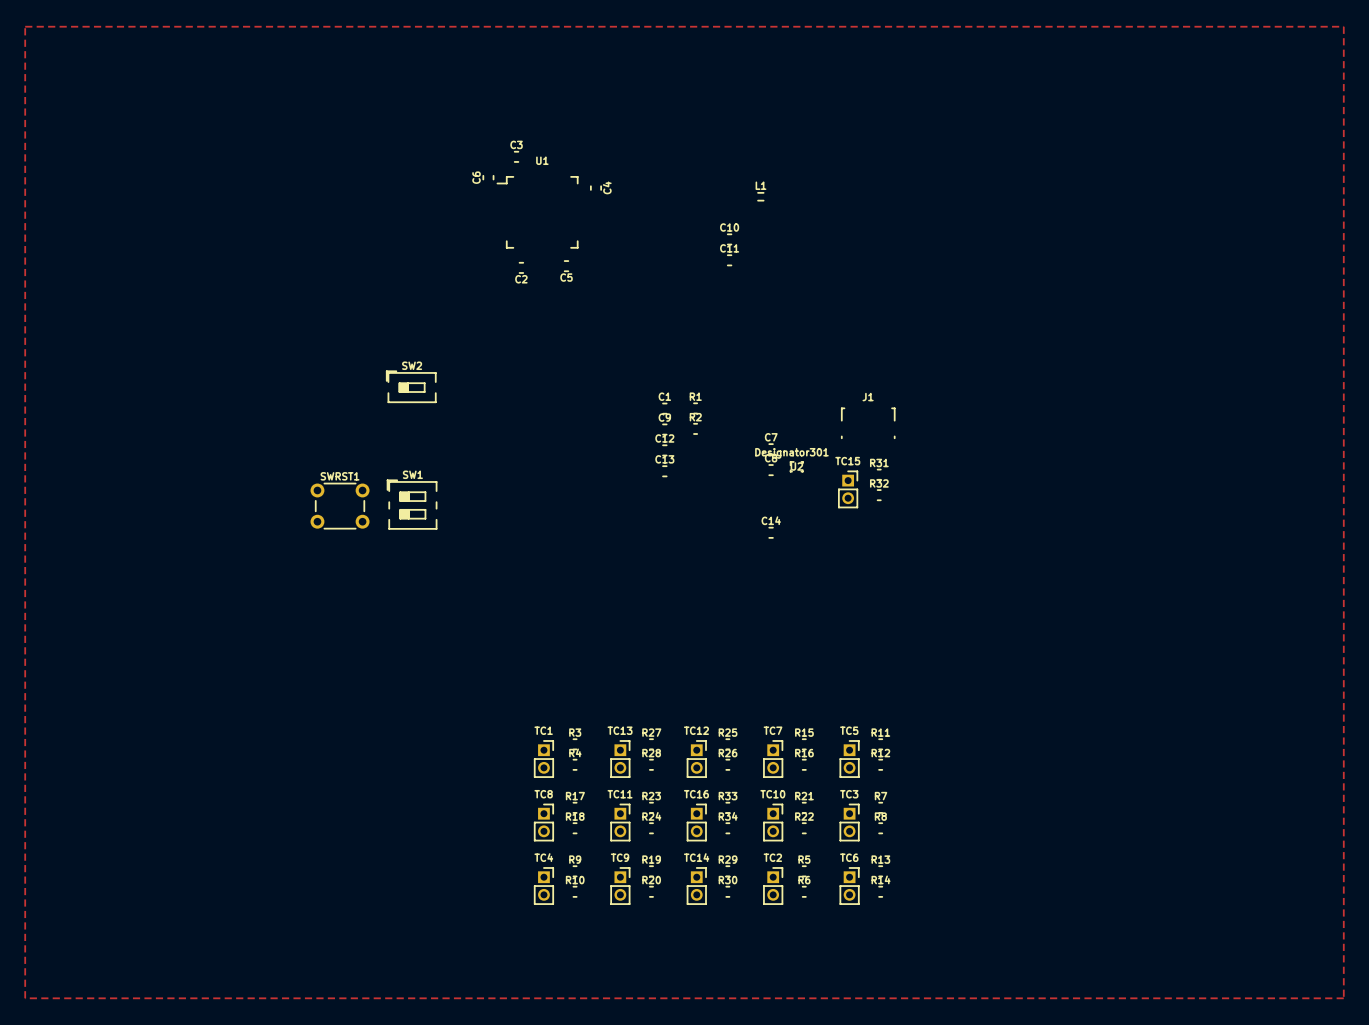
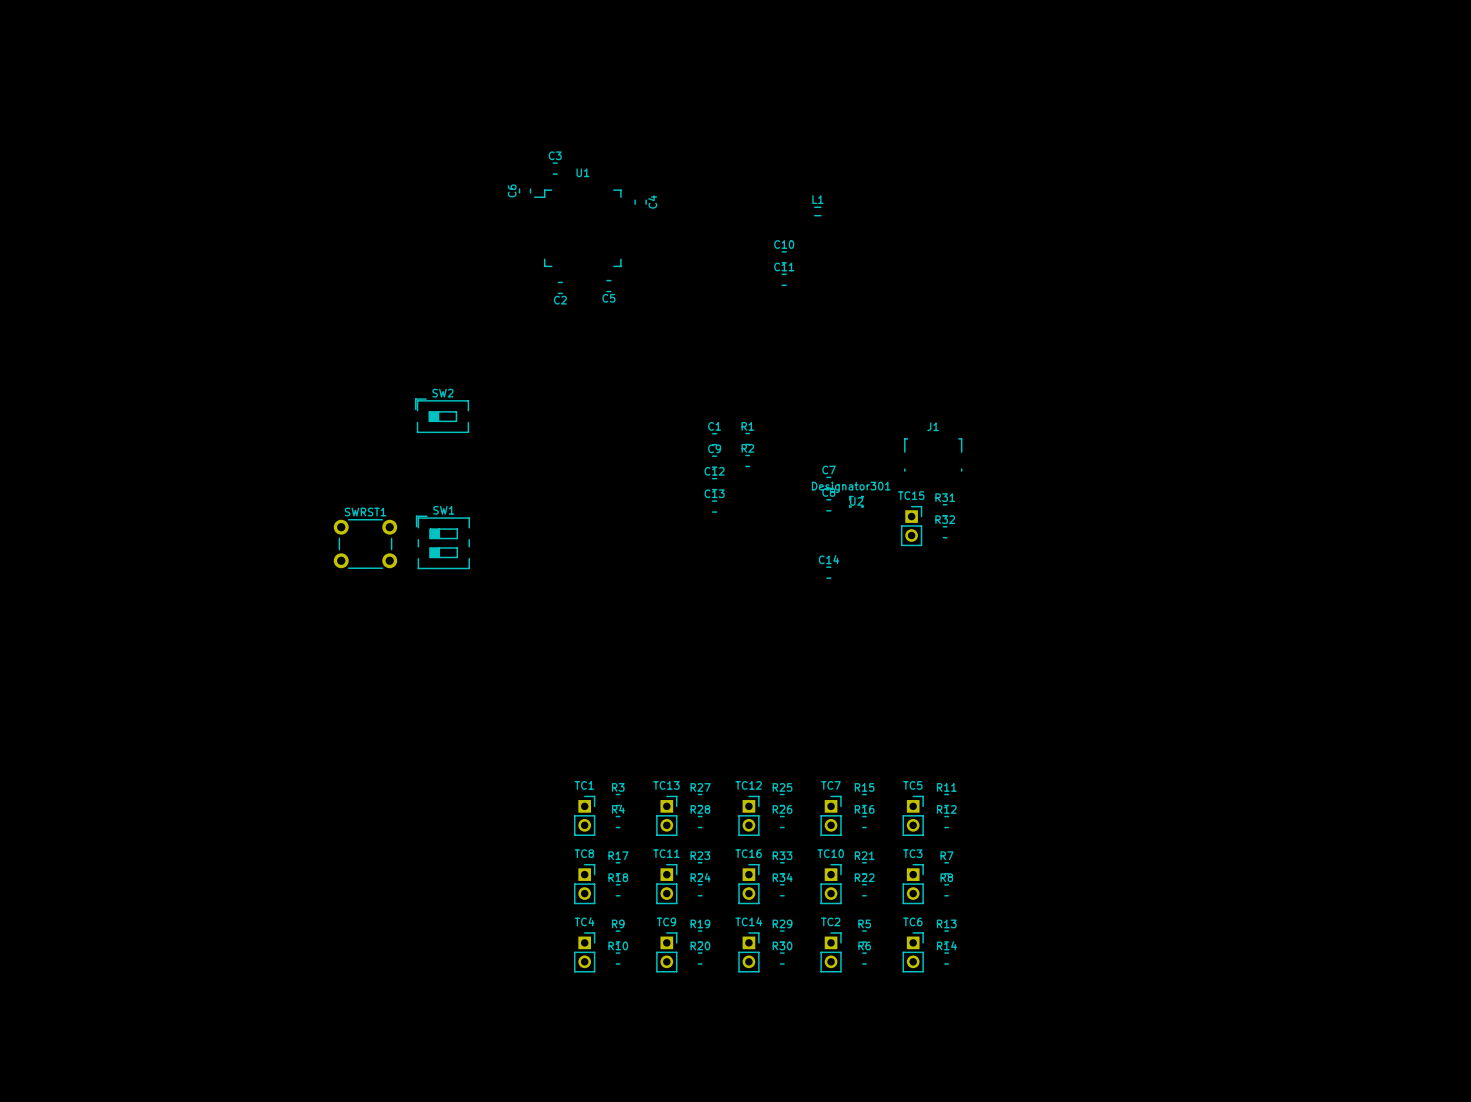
zone outline: (25, 26) (1343, 26) (1343, 998) (25, 998) (25, 26) -> none

